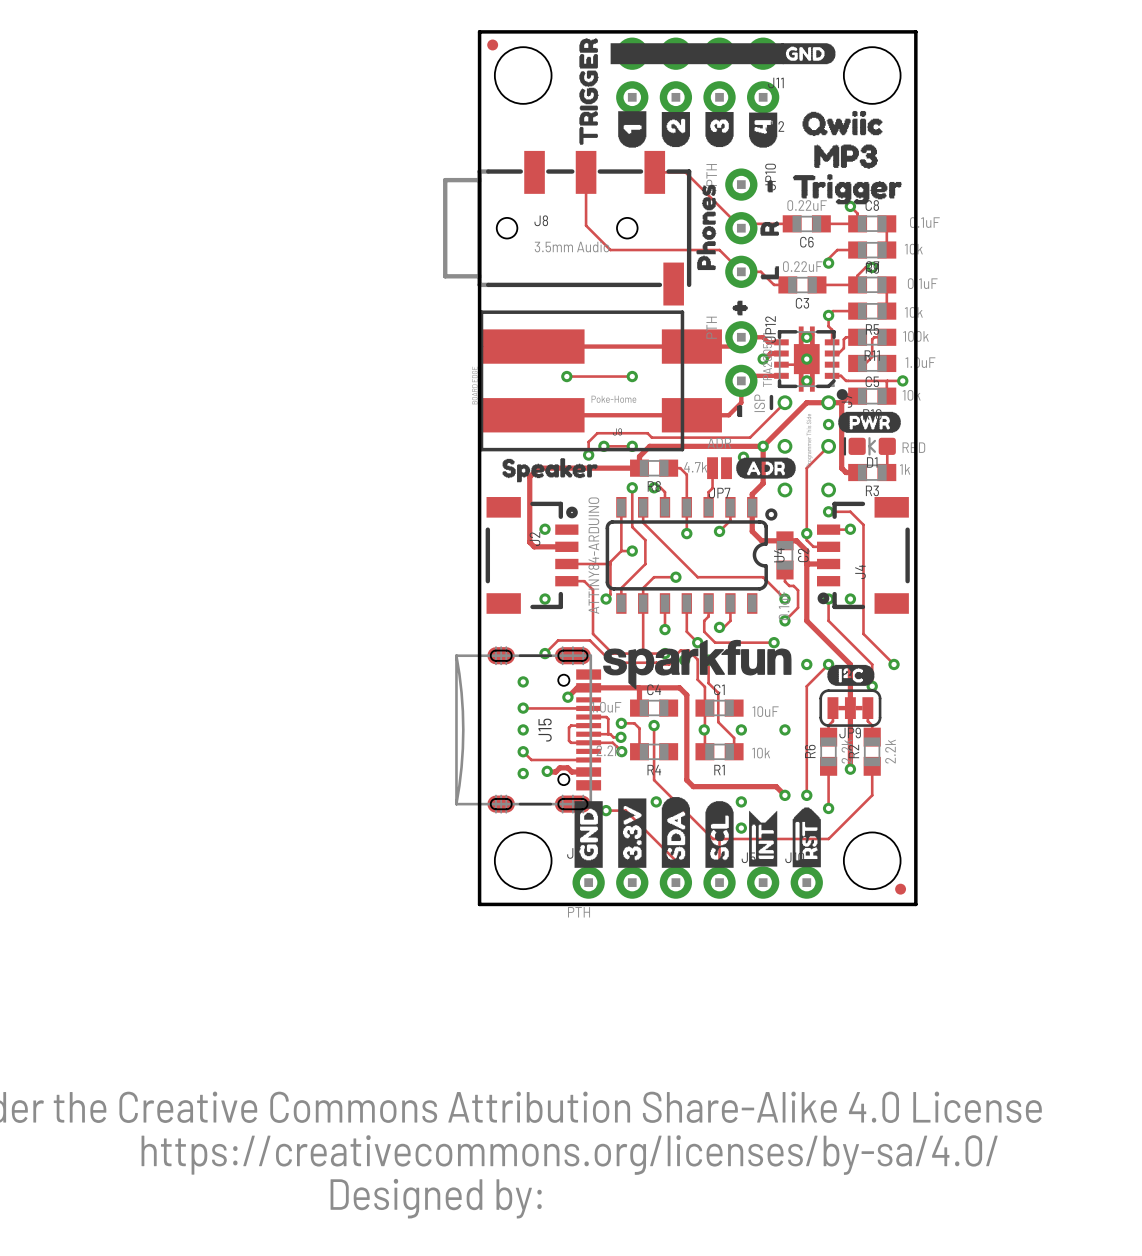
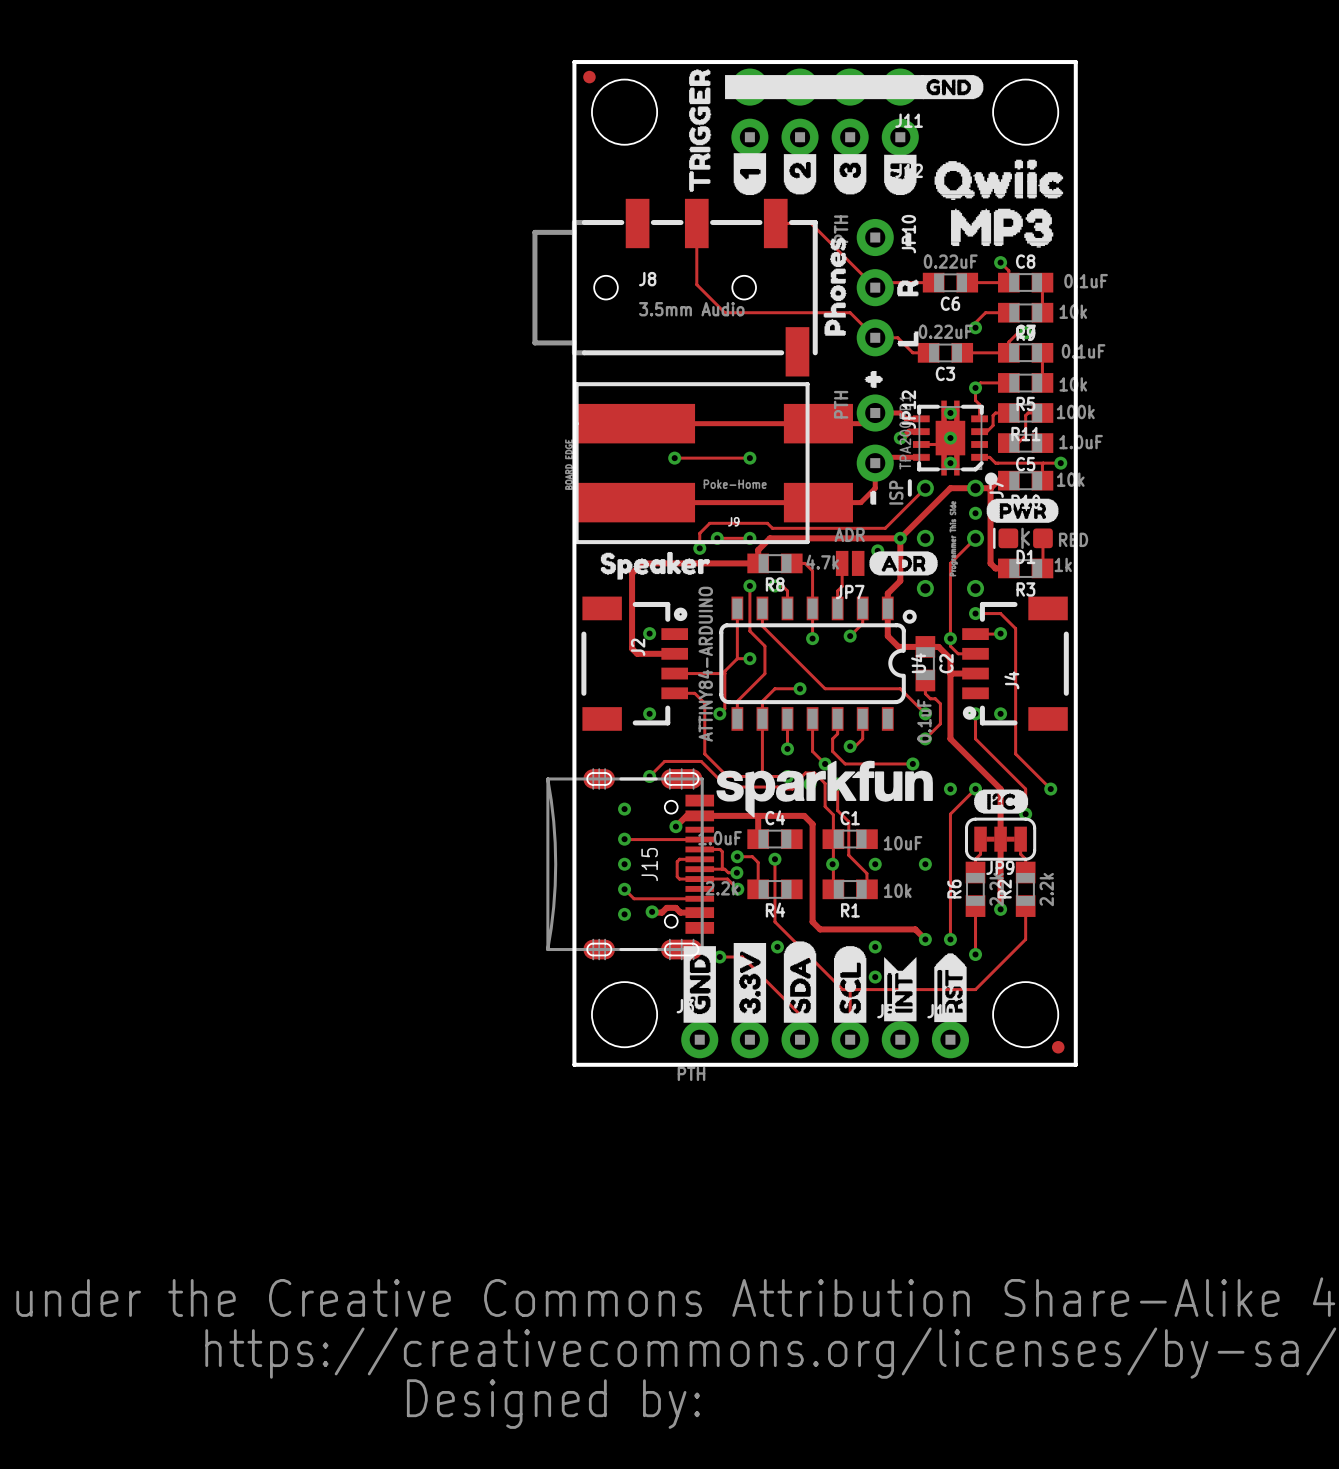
drawing: [792, 110, 903, 205] -> none
drawing: none -> [934, 159, 1064, 248]

